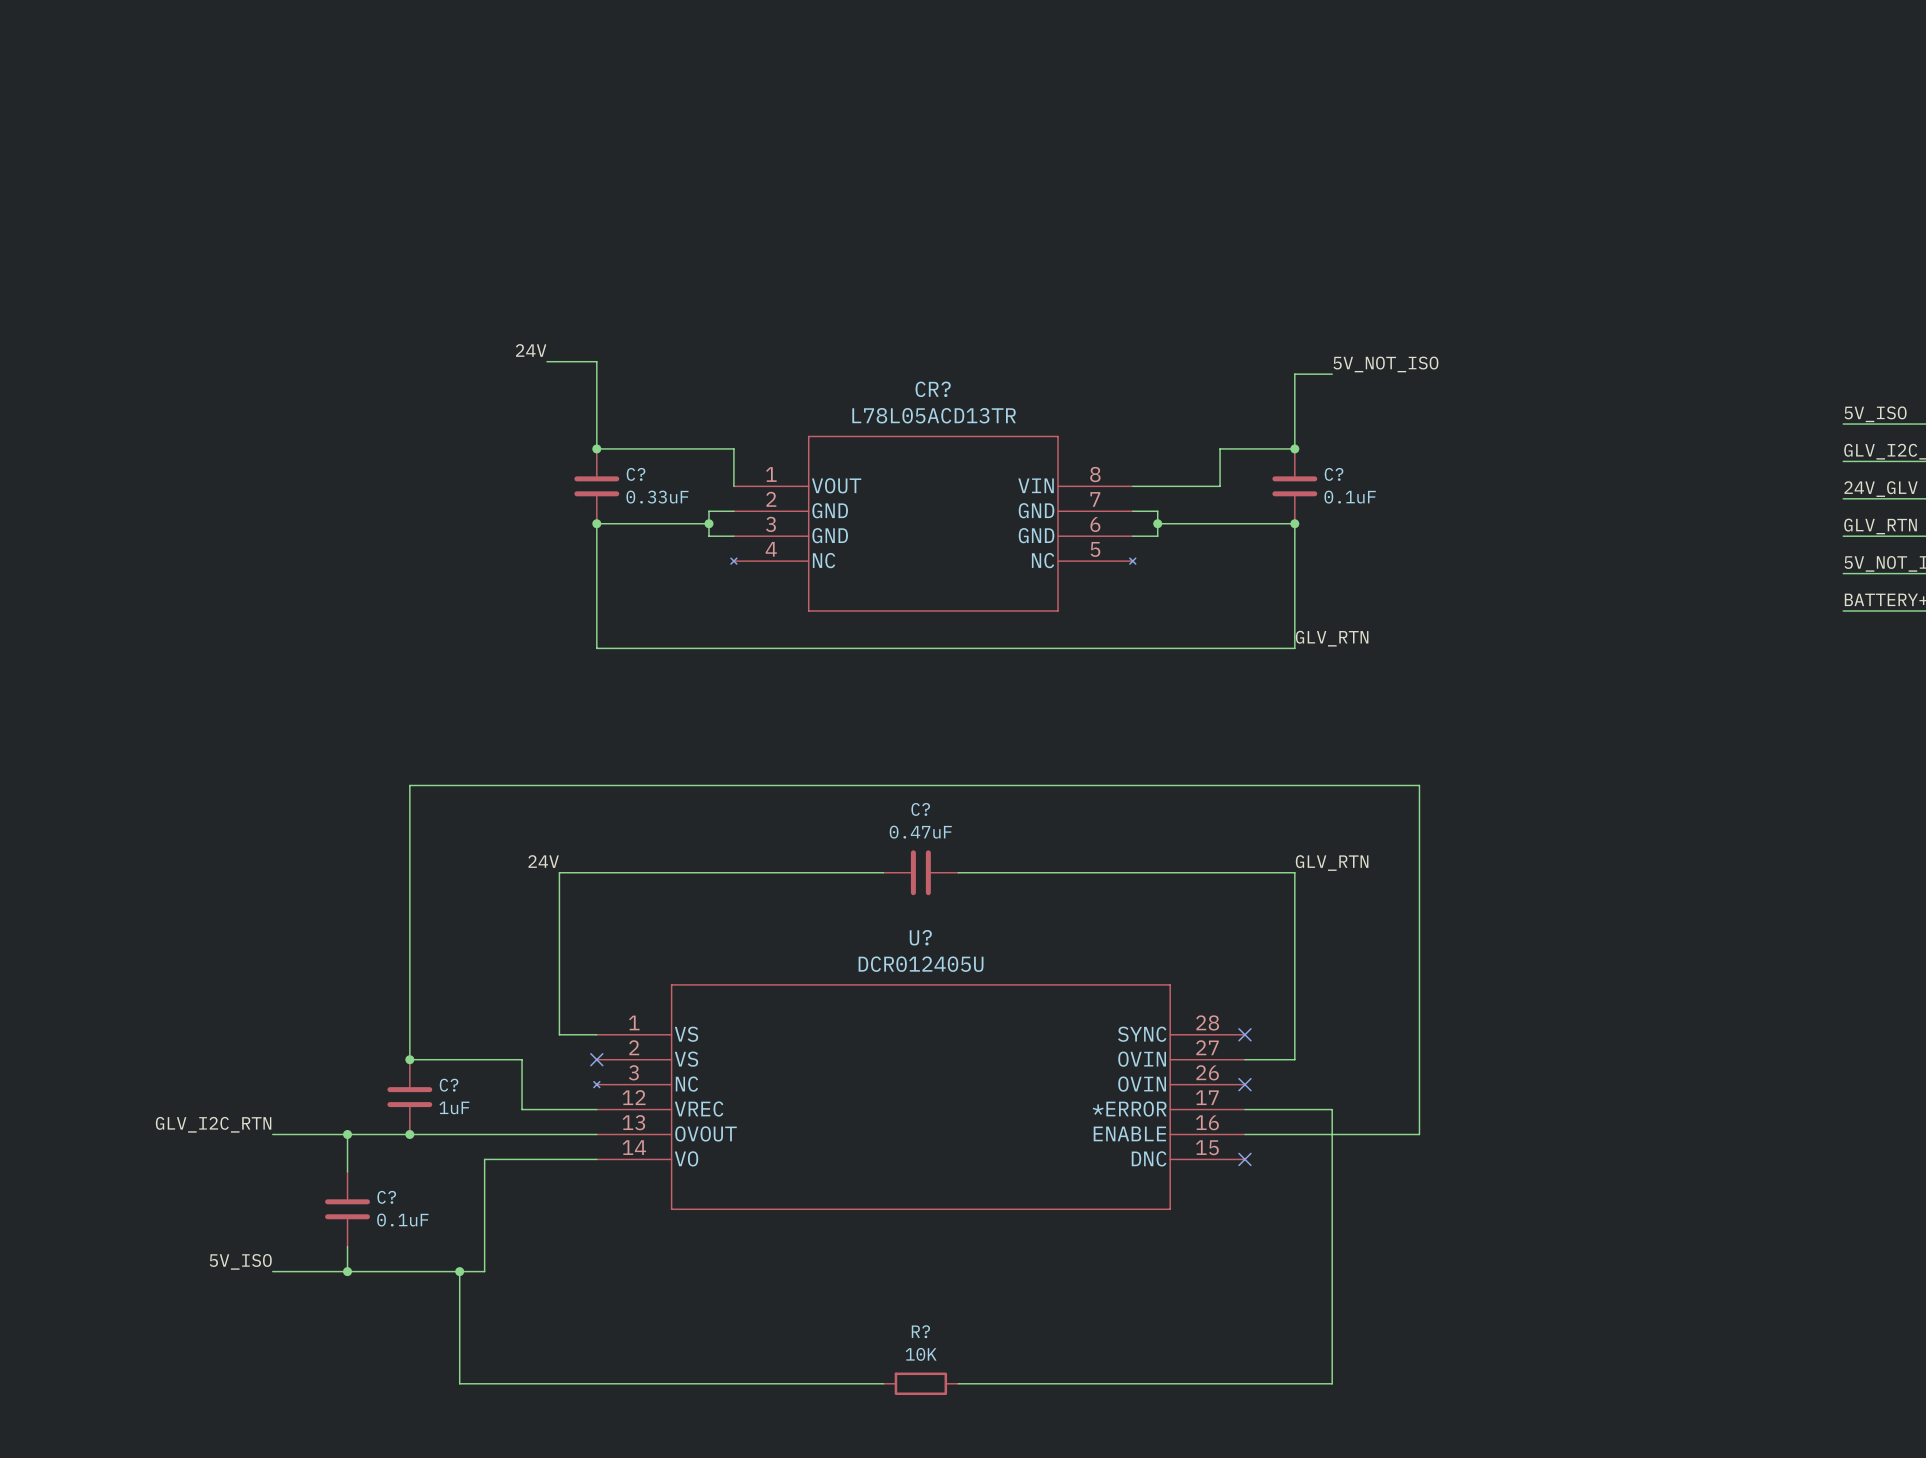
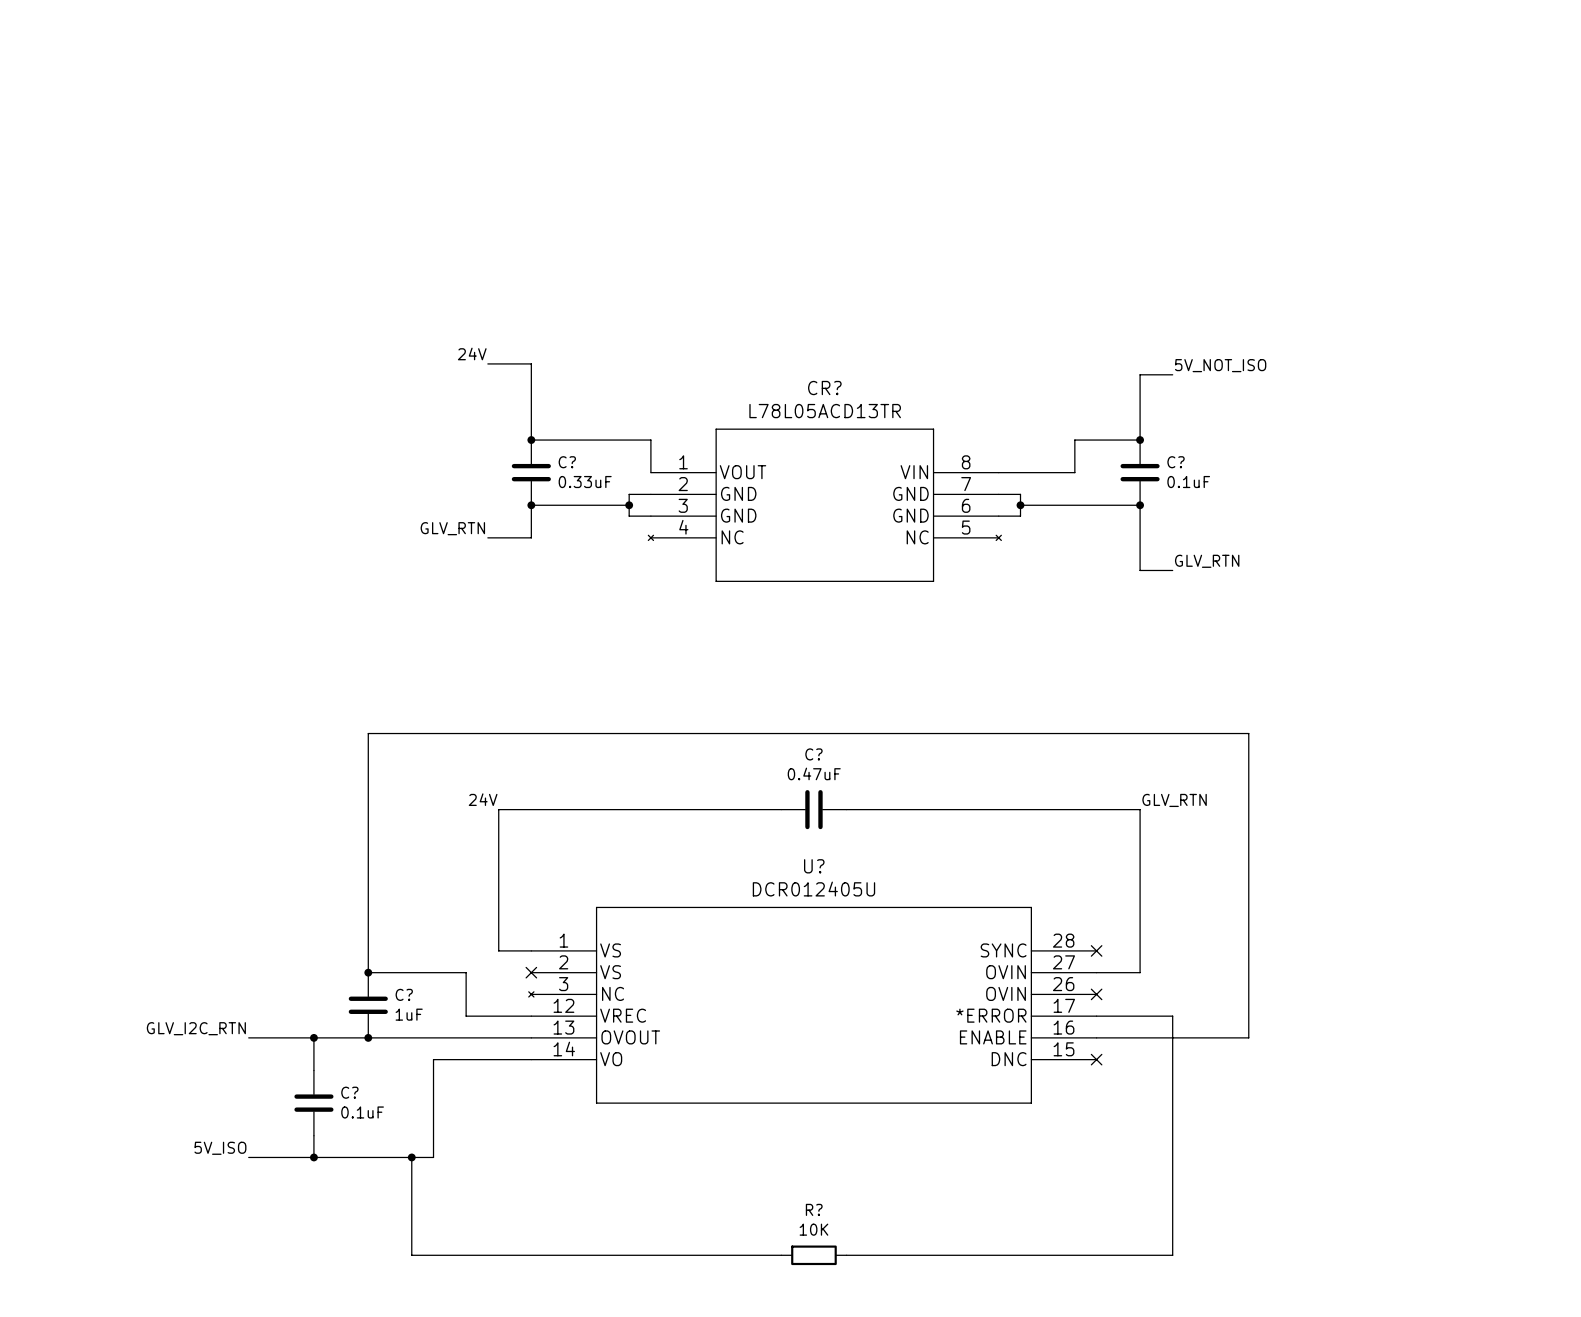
label: none -> GLV_RTN (452, 528)
wire: none -> (487, 537) (531, 537)
wire: (596, 561) (596, 648) (1294, 648) (1294, 598) -> (1172, 570) (1140, 570)
label position: GLV_RTN (1332, 638) -> GLV_RTN (1207, 561)

